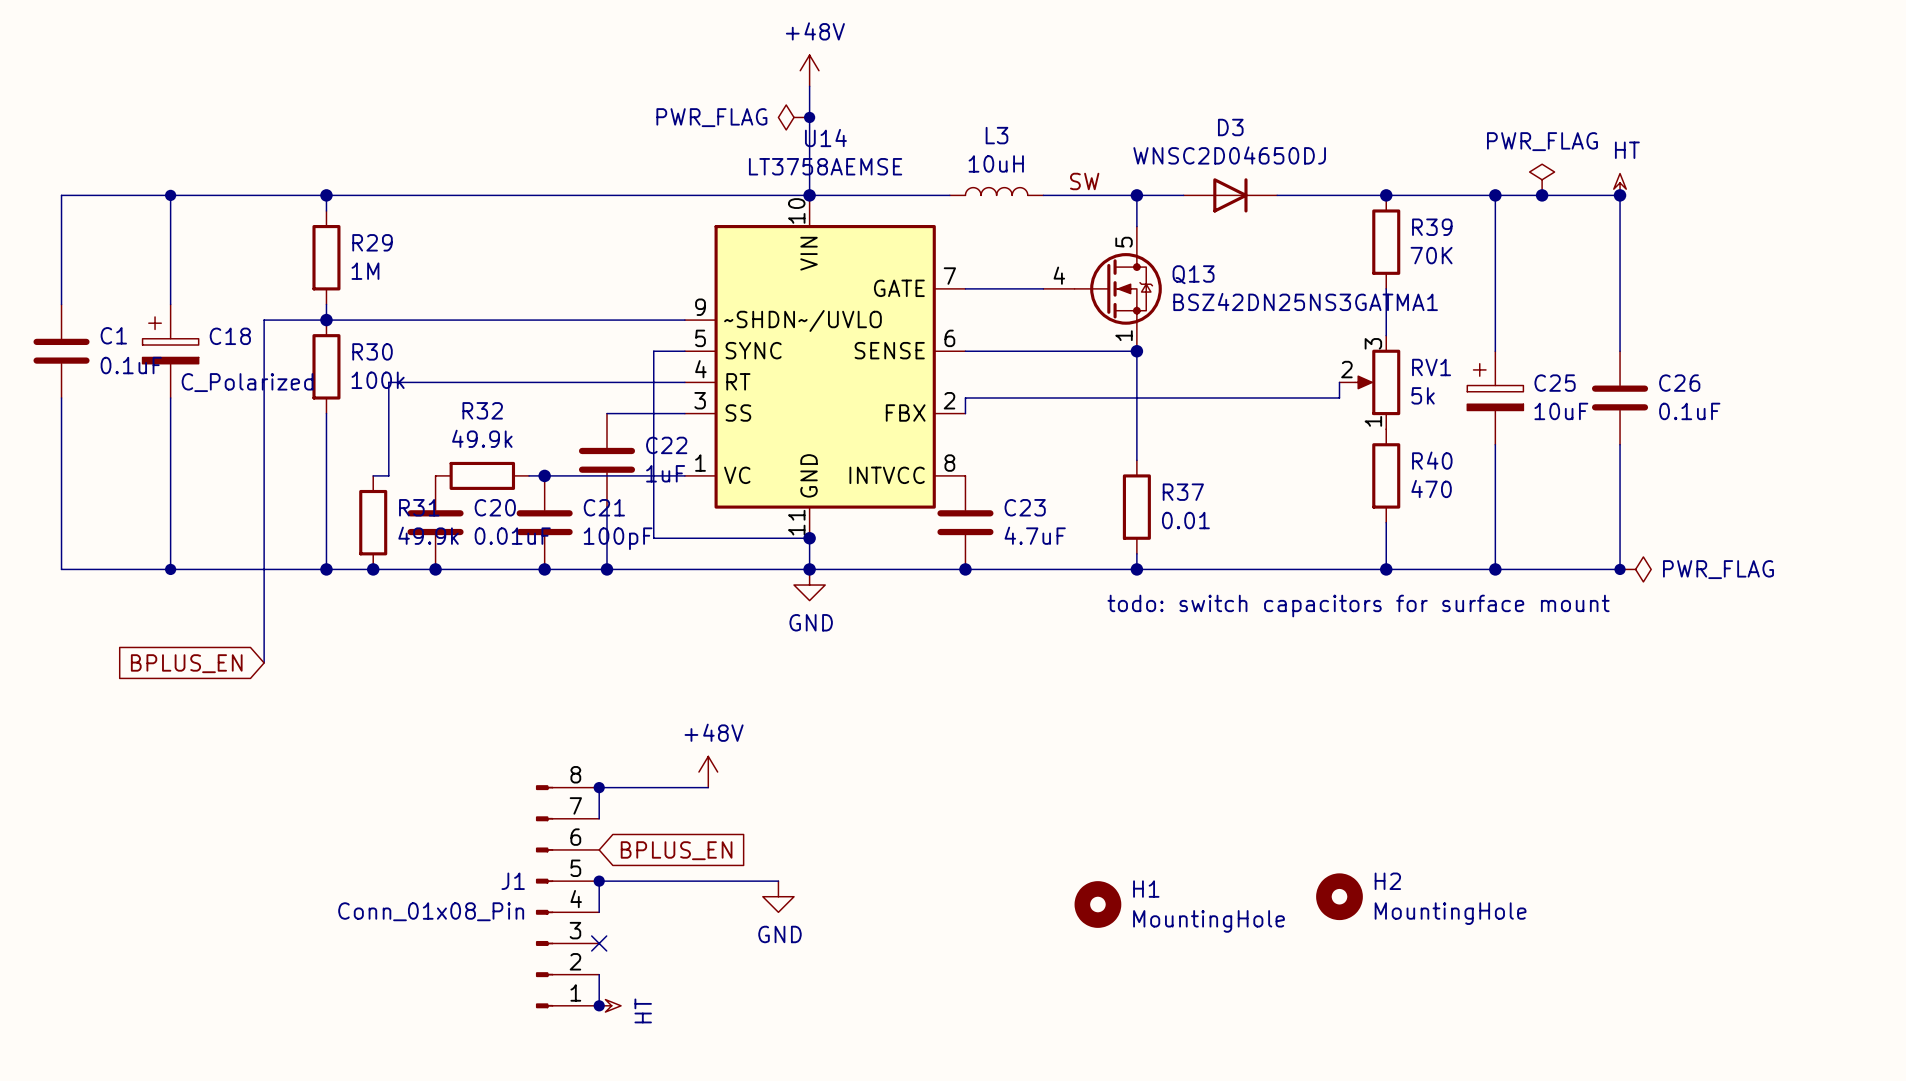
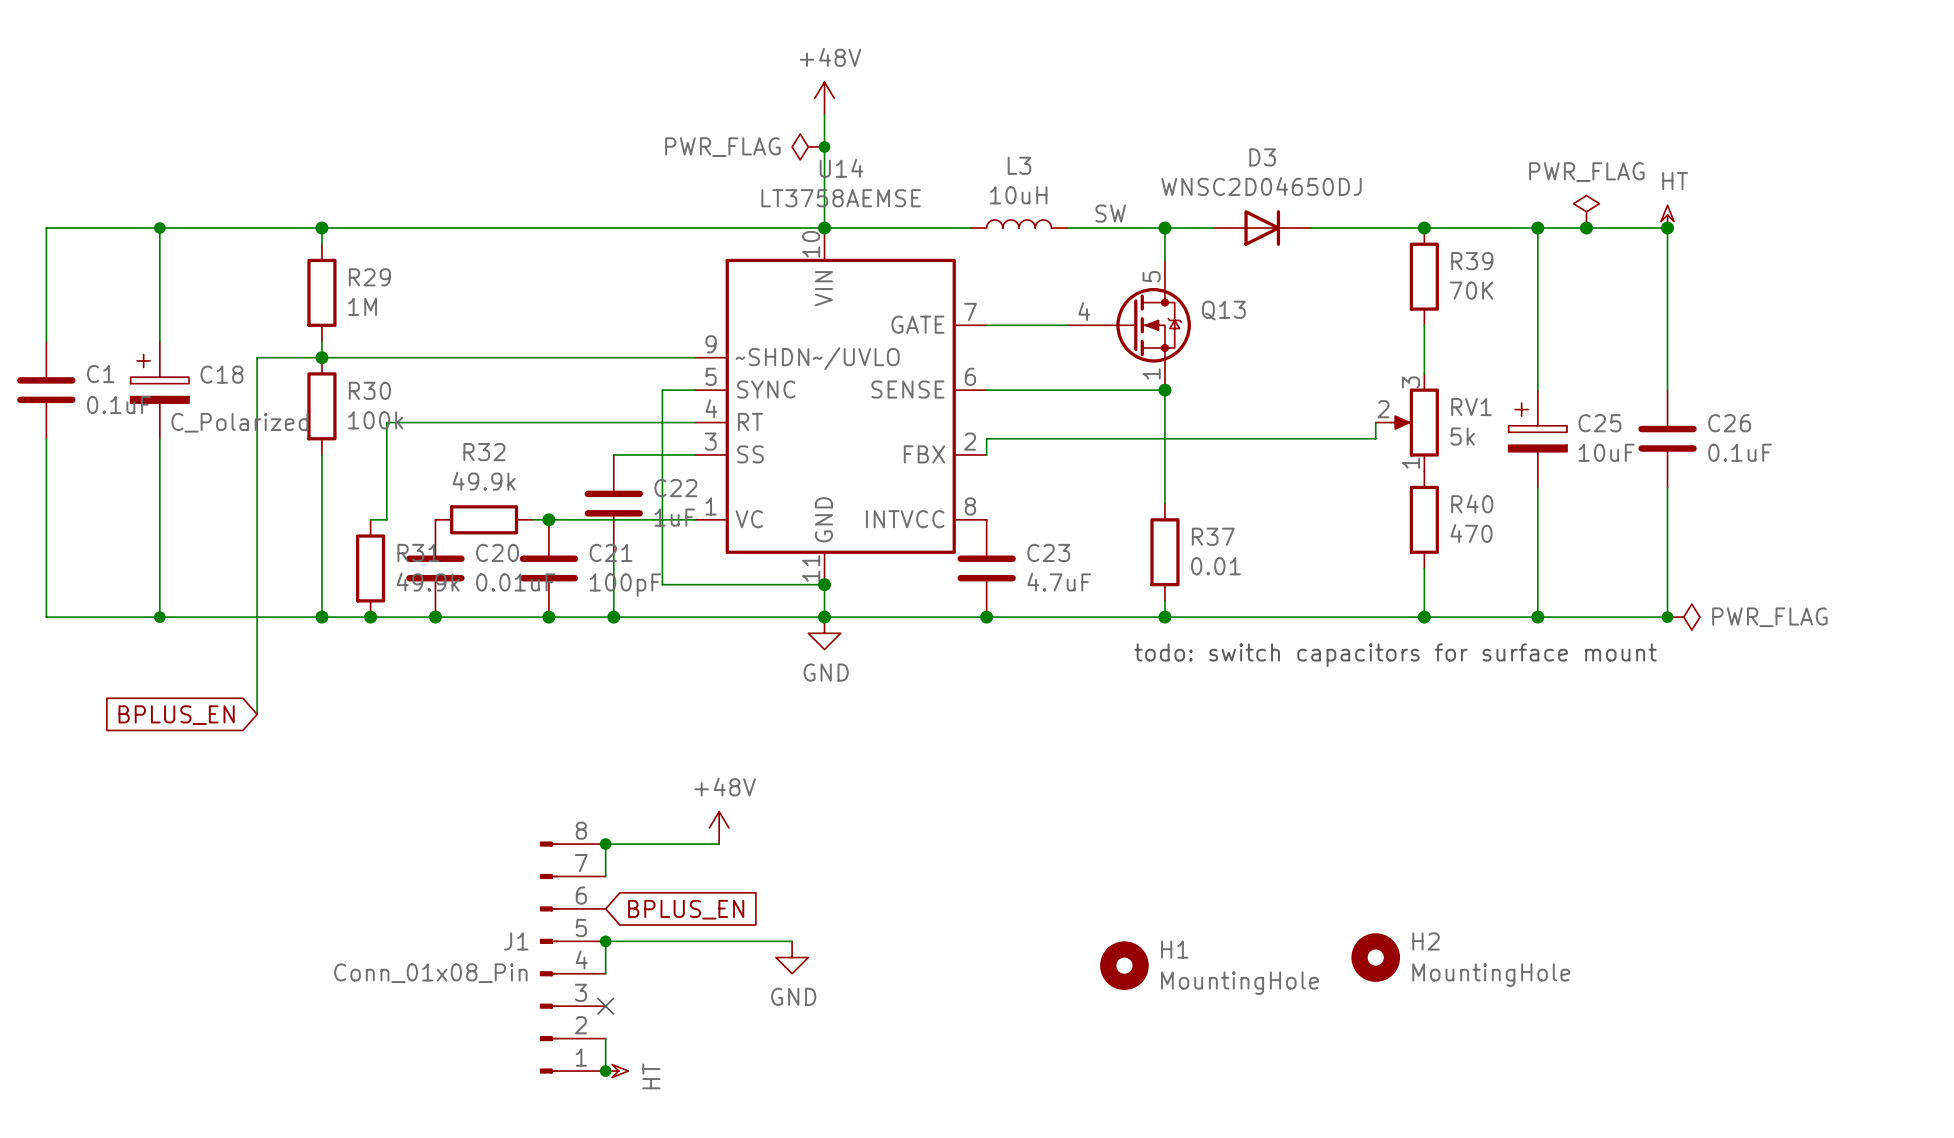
Q13 value: BSZ42DN25NS3GATMA1 (1305, 301) -> none

